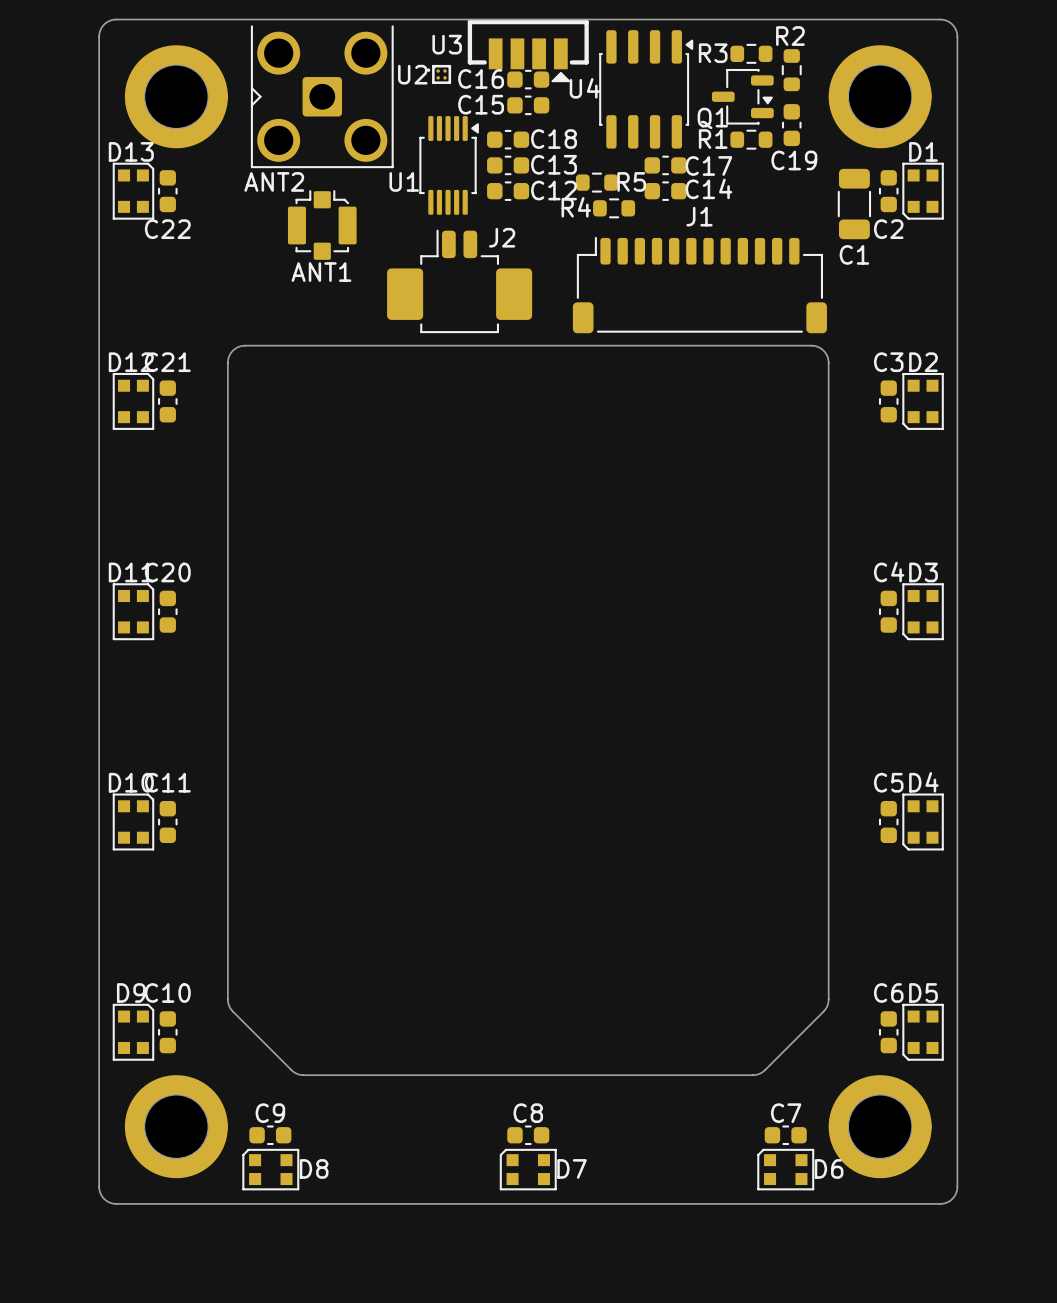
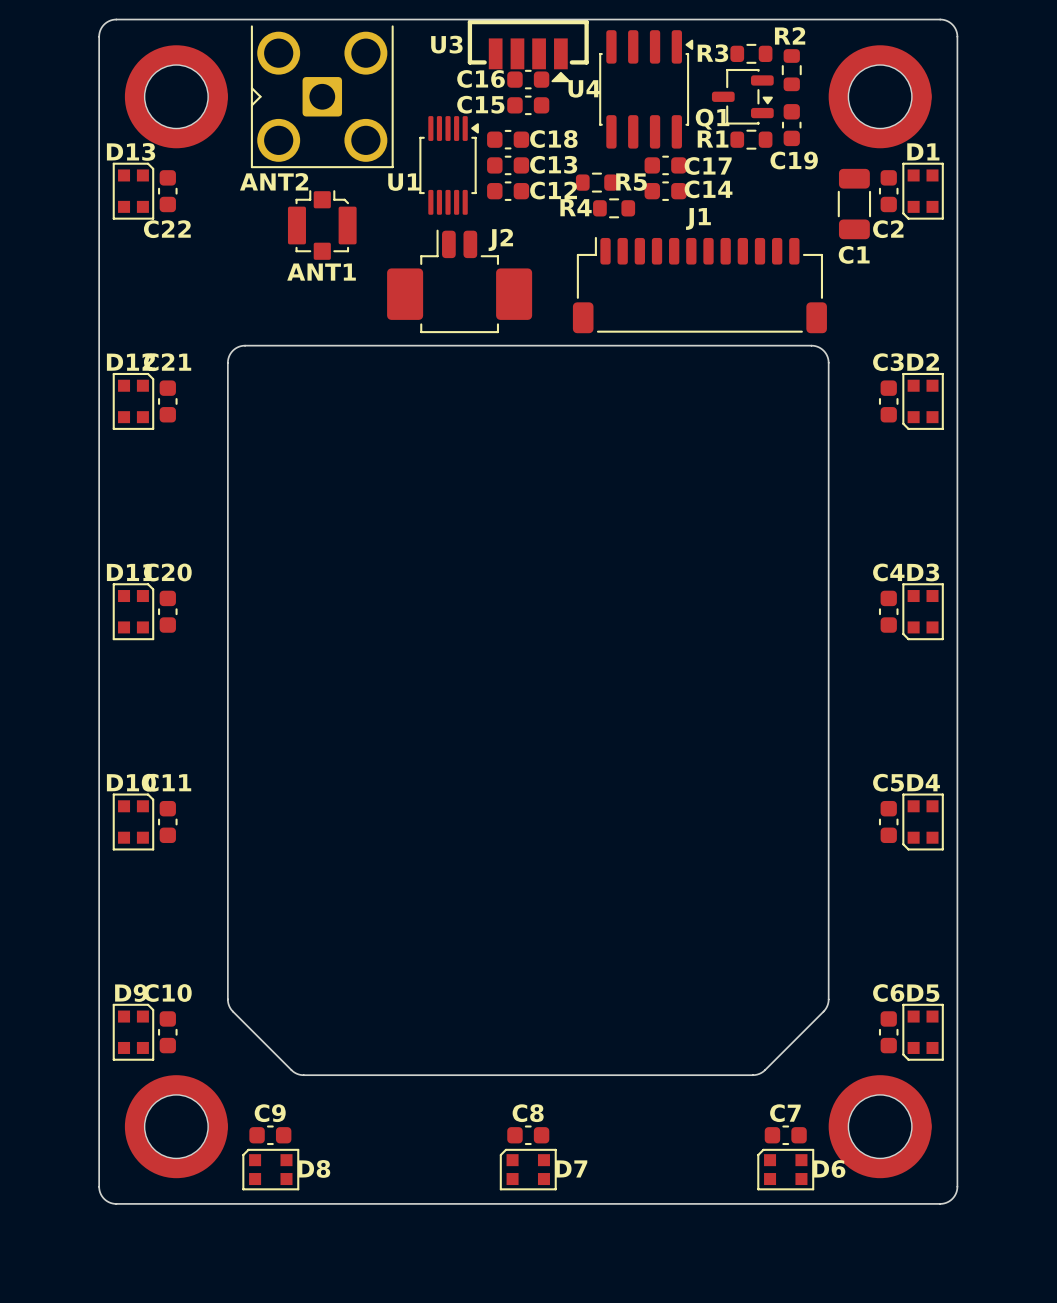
U2: (438, 74) -> none

